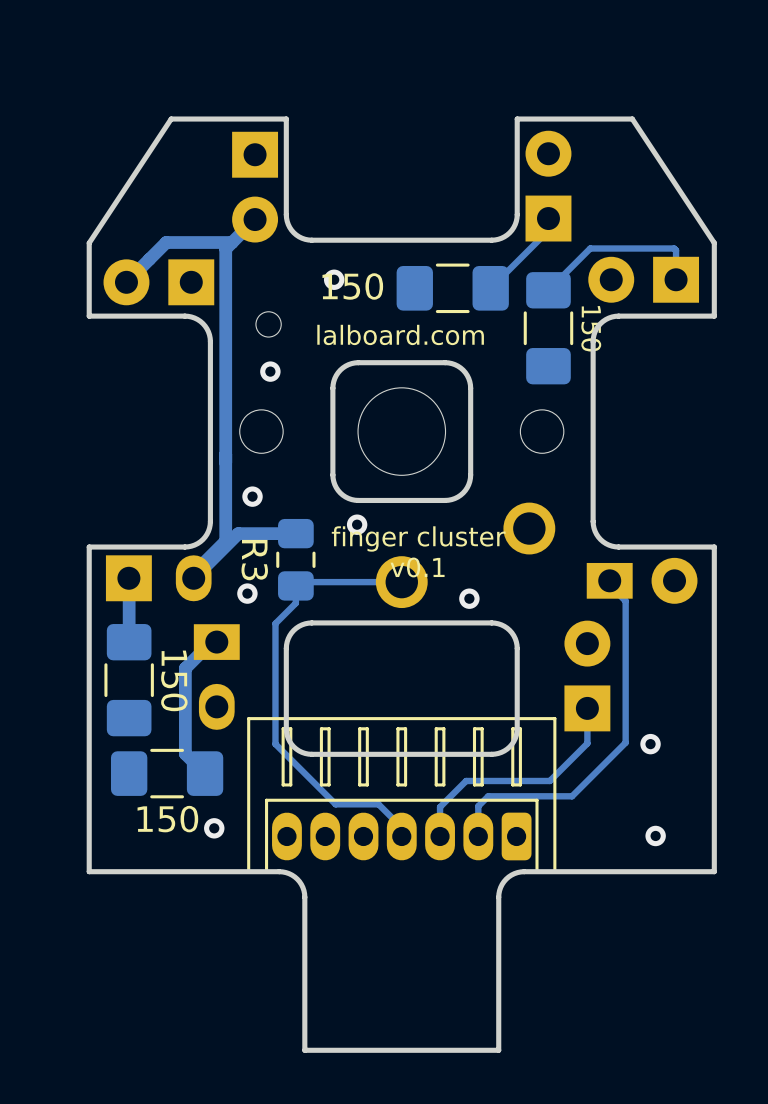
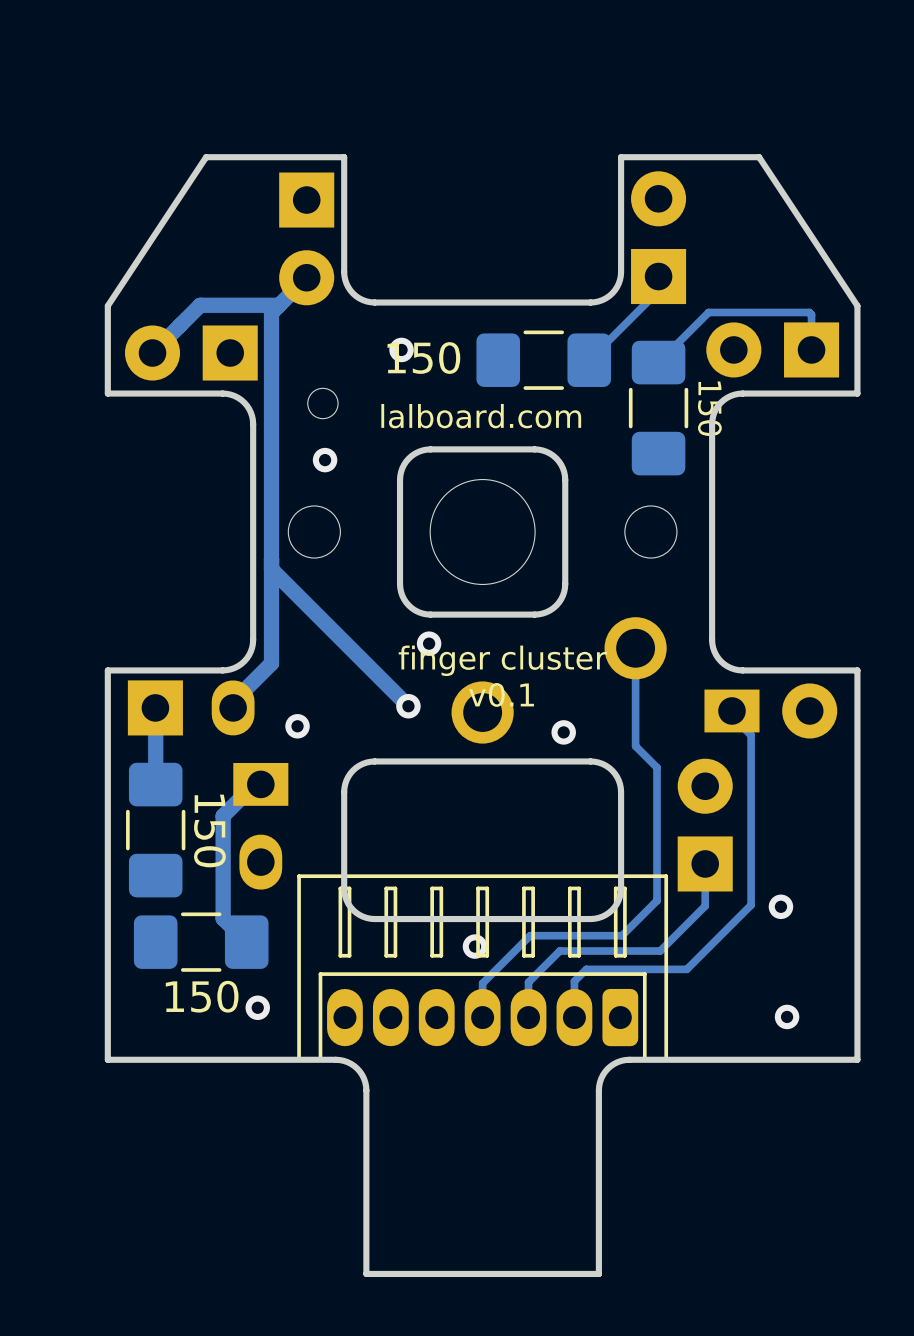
track: none -> (271, 569) (408, 706)
via position: (252, 496) -> (408, 706)
track: (295, 533) (238, 533) (193, 578) -> none
R3: (295, 559) -> none
track: (401, 582) (299, 582) (295, 585) (295, 603) (275, 623) (275, 744) (335, 804) (378, 804) (401, 827) -> (635, 648) (635, 746) (657, 767) (657, 900) (622, 935) (530, 935) (482, 983) (482, 1006)
via: none -> (474, 946)

